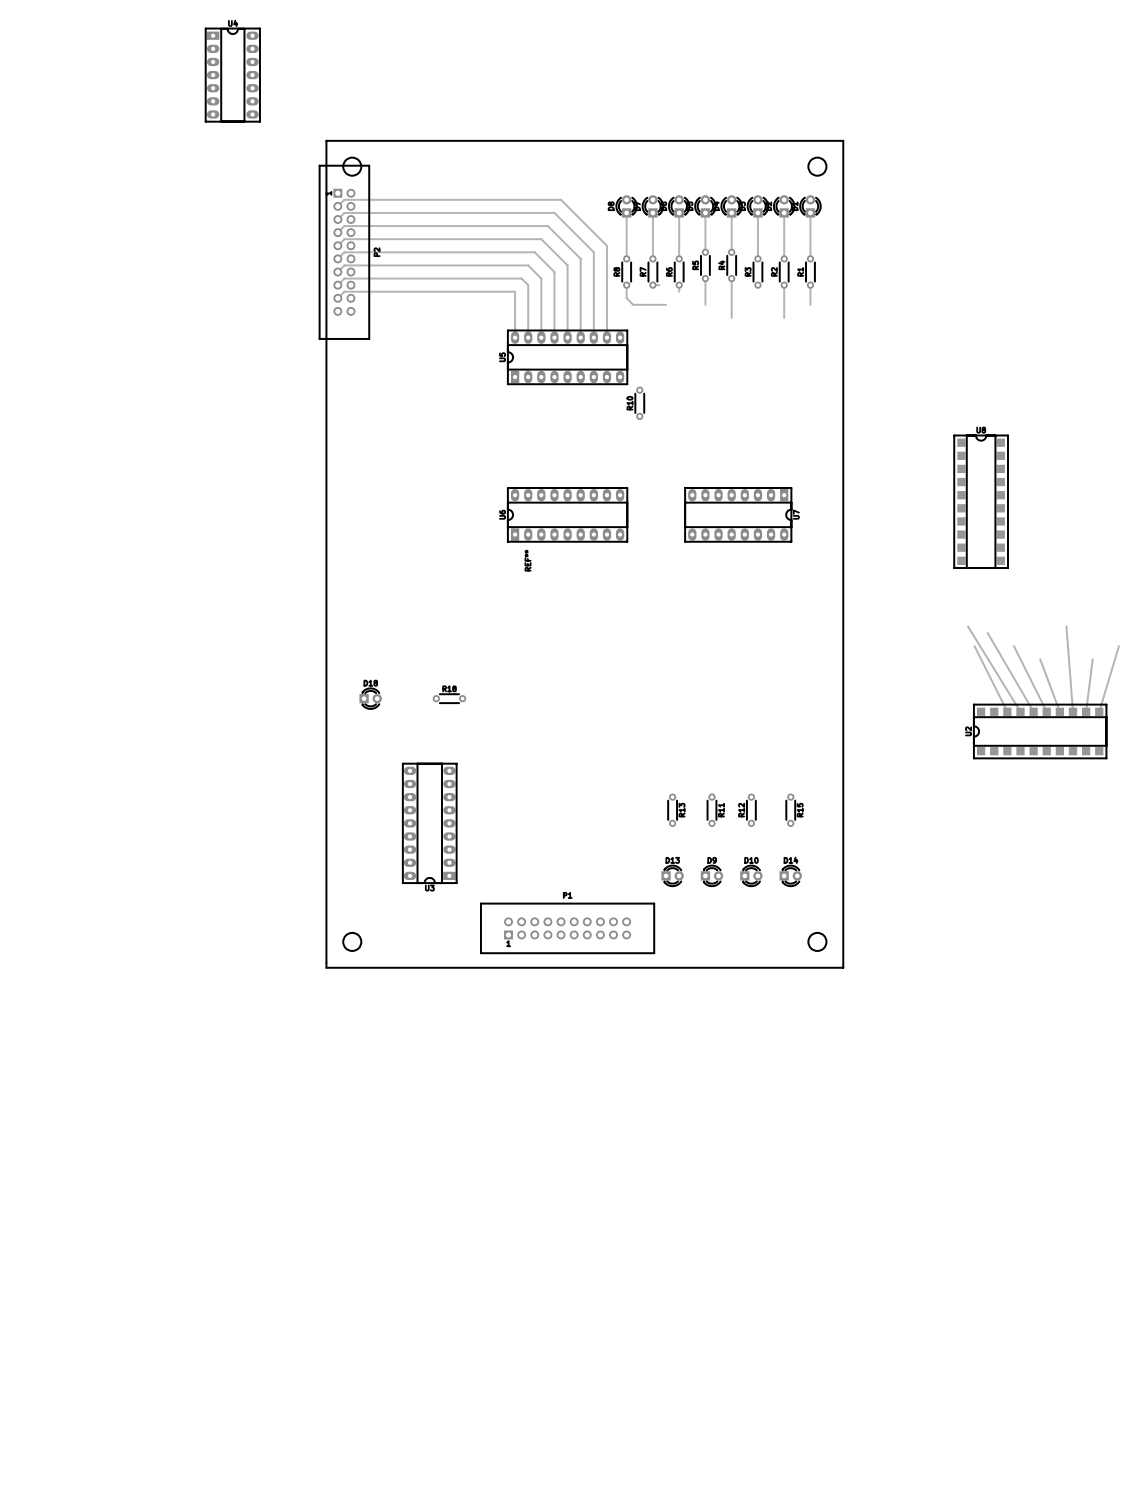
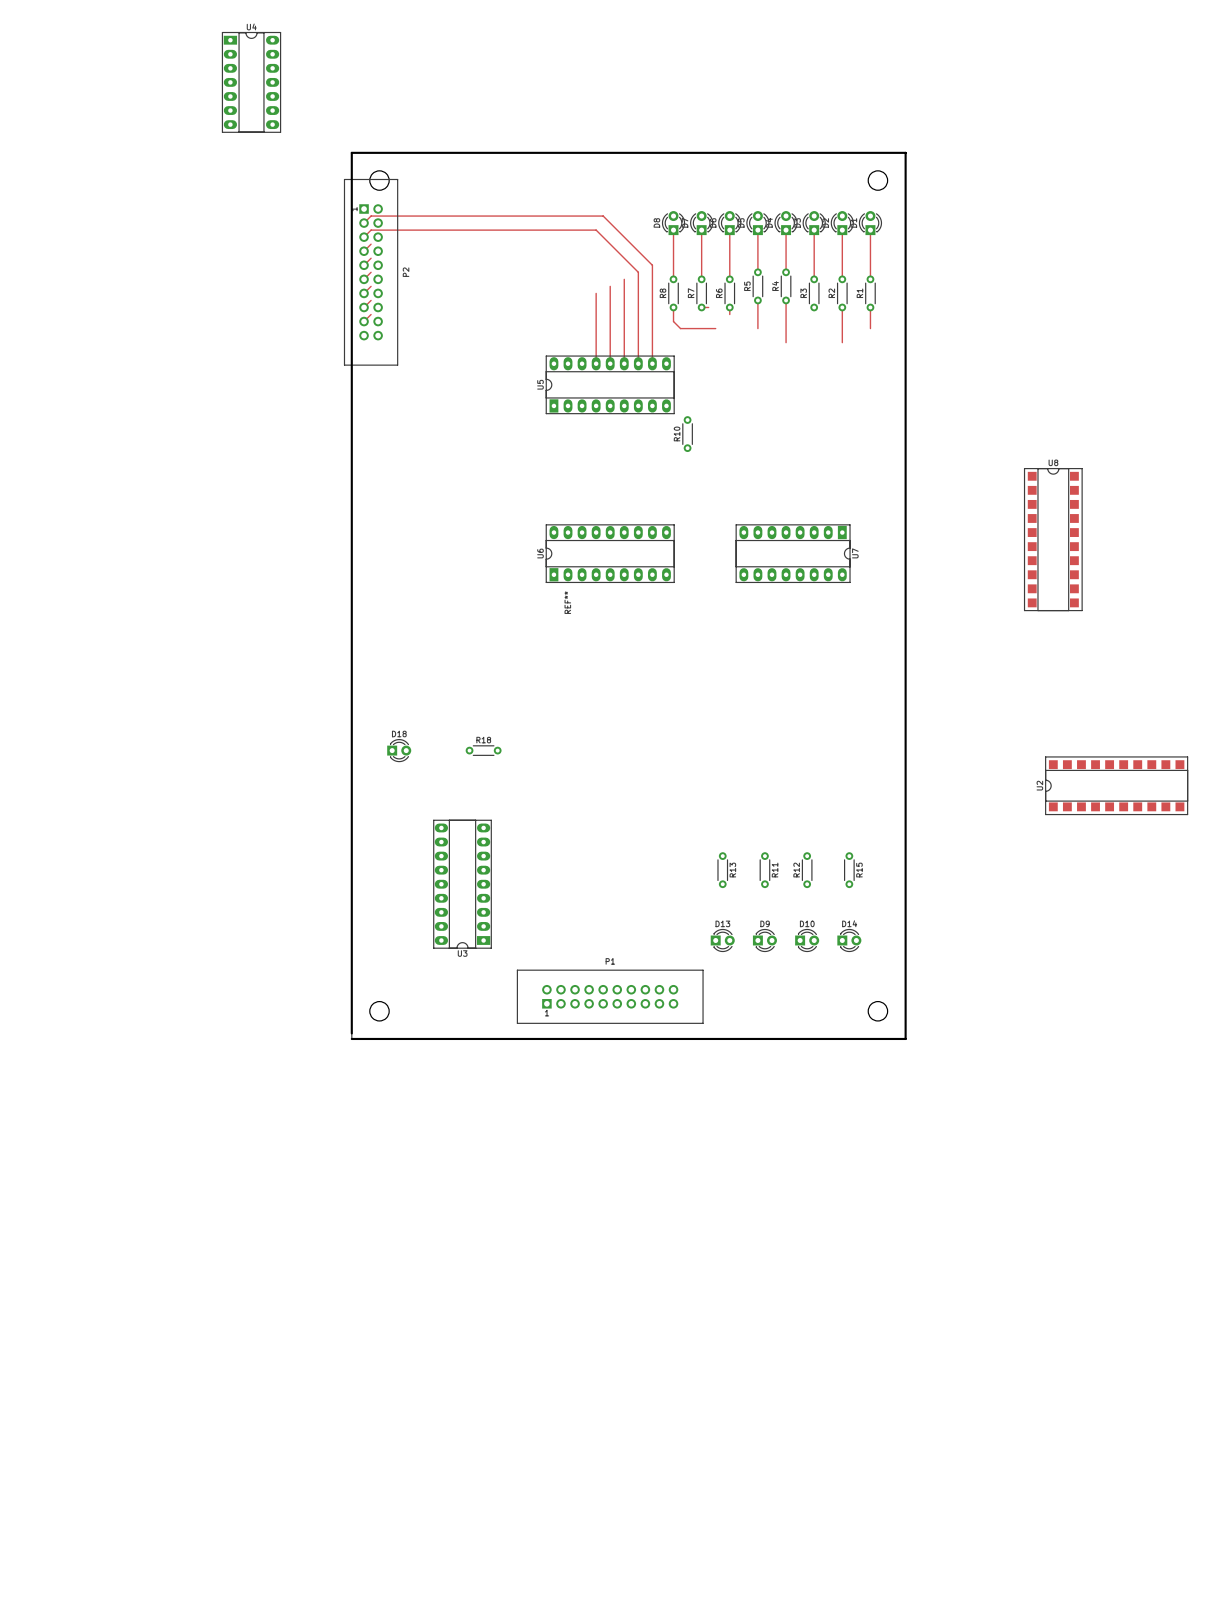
track: (344, 226) (547, 226) (580, 258) -> none
track: (344, 239) (541, 239) (567, 265) -> none
track: (344, 252) (534, 252) (554, 272) -> none
track: (344, 265) (528, 265) (541, 278) (541, 337) -> none
track: (344, 278) (521, 278) (528, 285) (528, 337) -> none
track: (344, 291) (515, 291) (515, 337) -> none
track: (967, 626) (1020, 711) -> none
track: (1066, 626) (1073, 711) -> none
track: (987, 633) (1033, 711) -> none
track: (974, 646) (1007, 711) -> none
track: (1013, 646) (1046, 711) -> none
track: (1118, 646) (1099, 711) -> none
track: (1040, 659) (1059, 711) -> none
track: (1092, 659) (1086, 711) -> none

